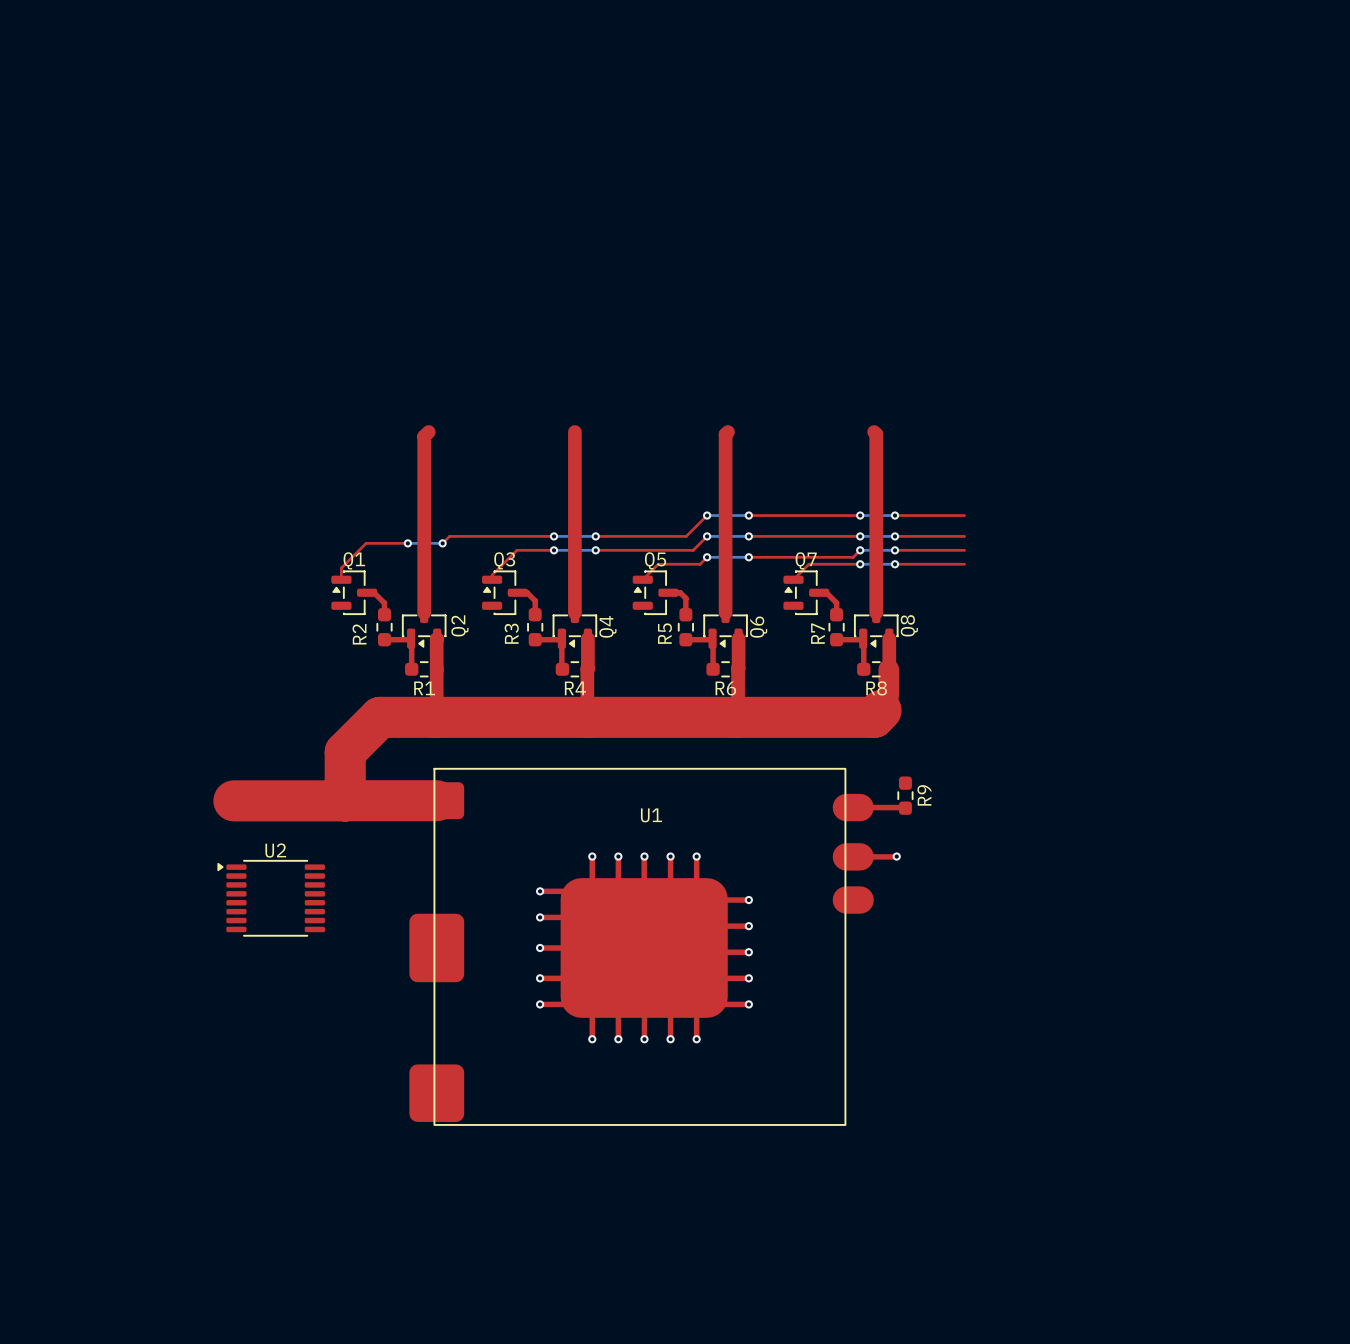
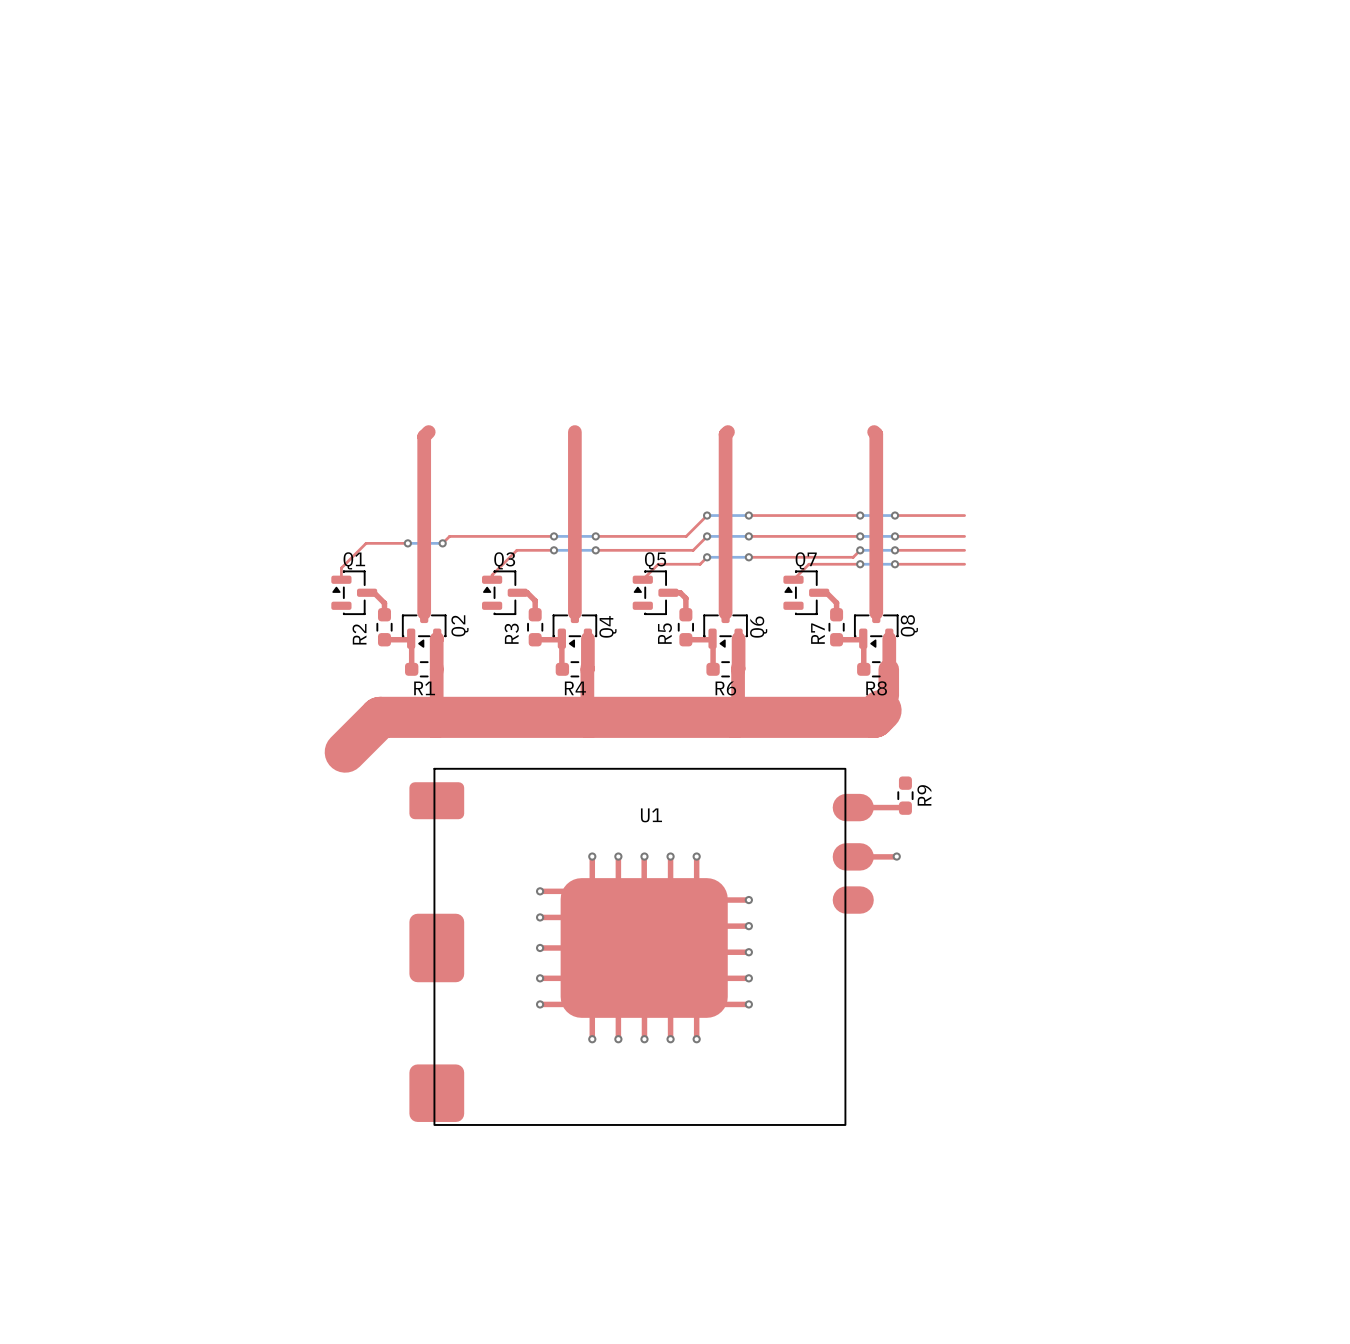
top track: (345, 752) (345, 800) (233, 800) -> none
top track: (345, 800) (436, 800) -> none
U2: (271, 898) -> none

